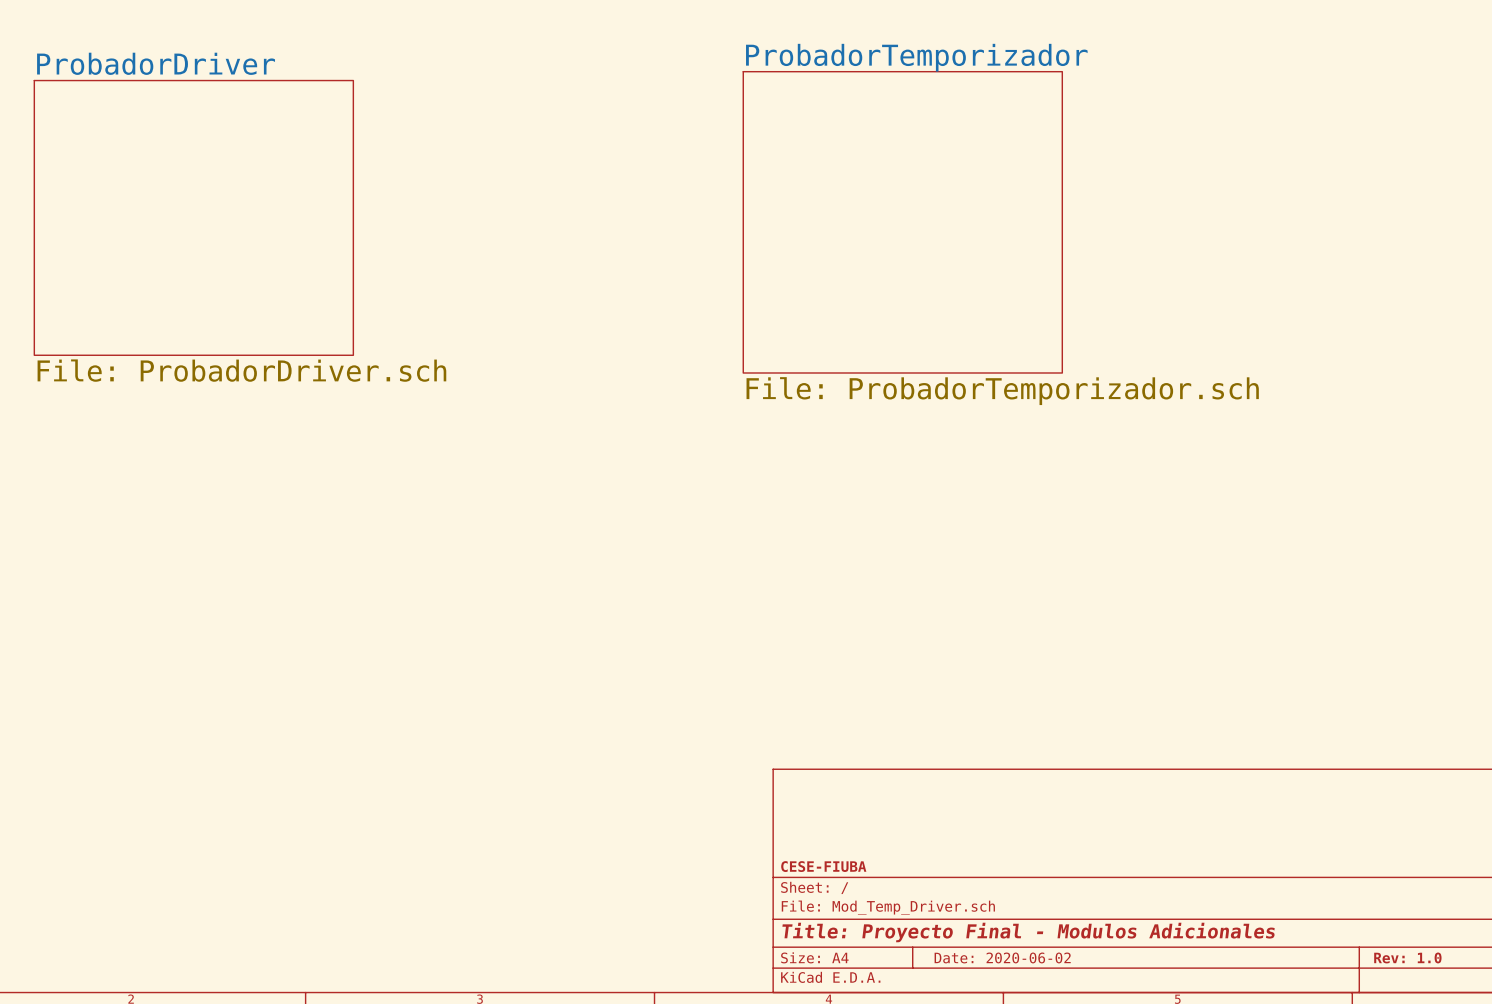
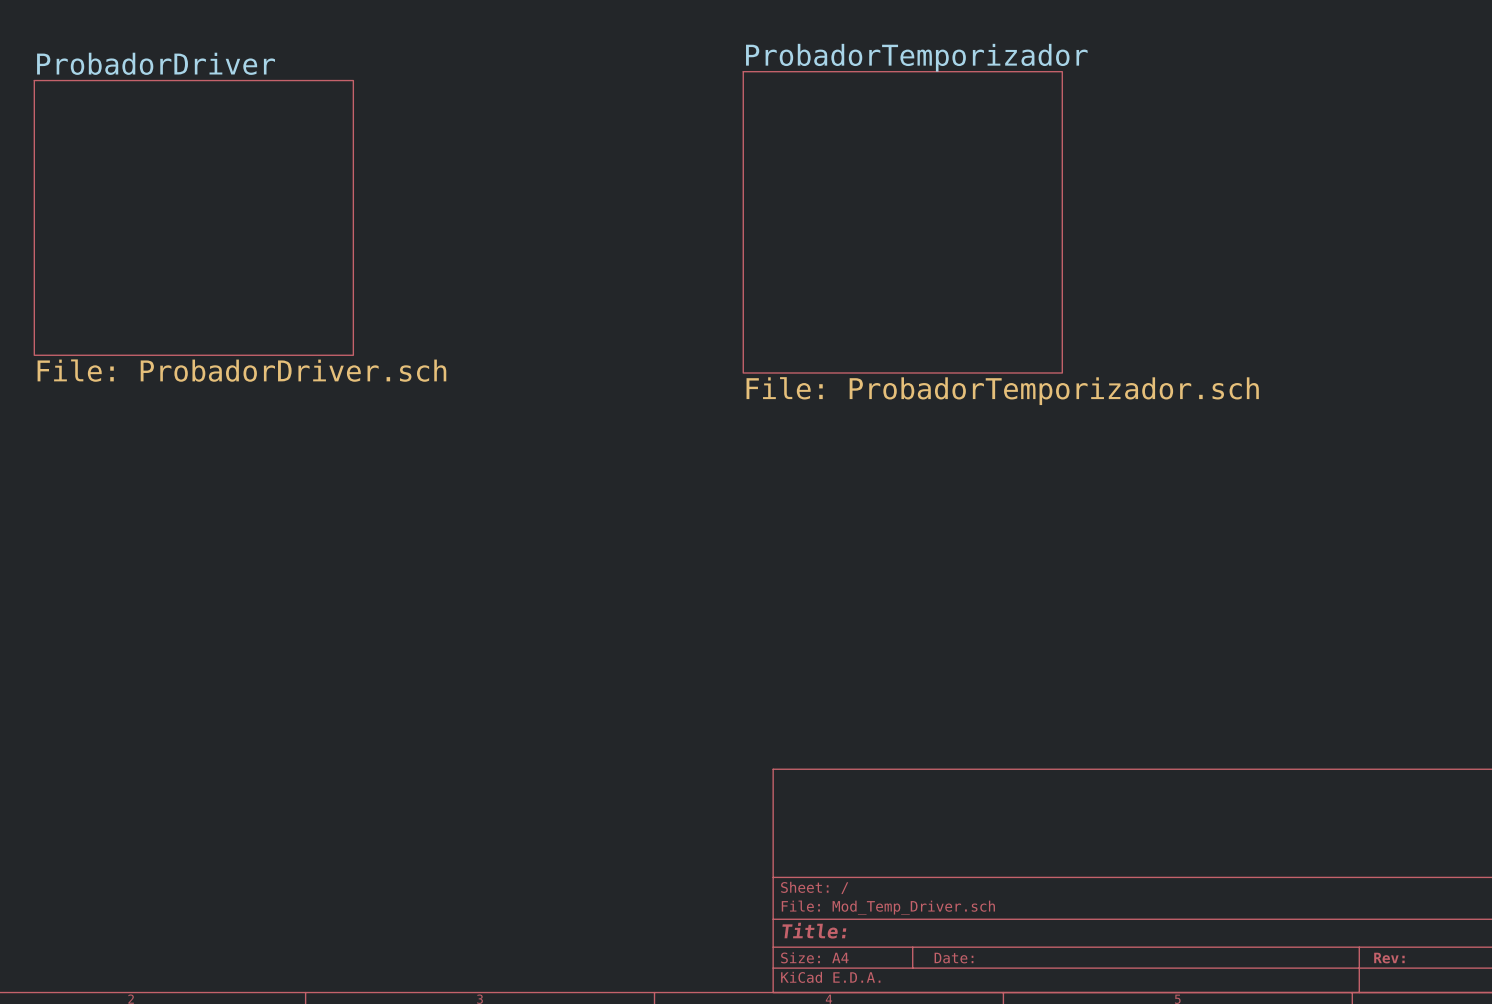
title block: CESE-FIUBA (823, 866) -> none
title block: Title: Proyecto Final - Modulos Adicionales (1028, 932) -> Title: (814, 930)
title block: Date: 2020-06-02 (1002, 957) -> Date: (954, 958)
title block: Rev: 1.0 (1407, 957) -> Rev: (1389, 958)

